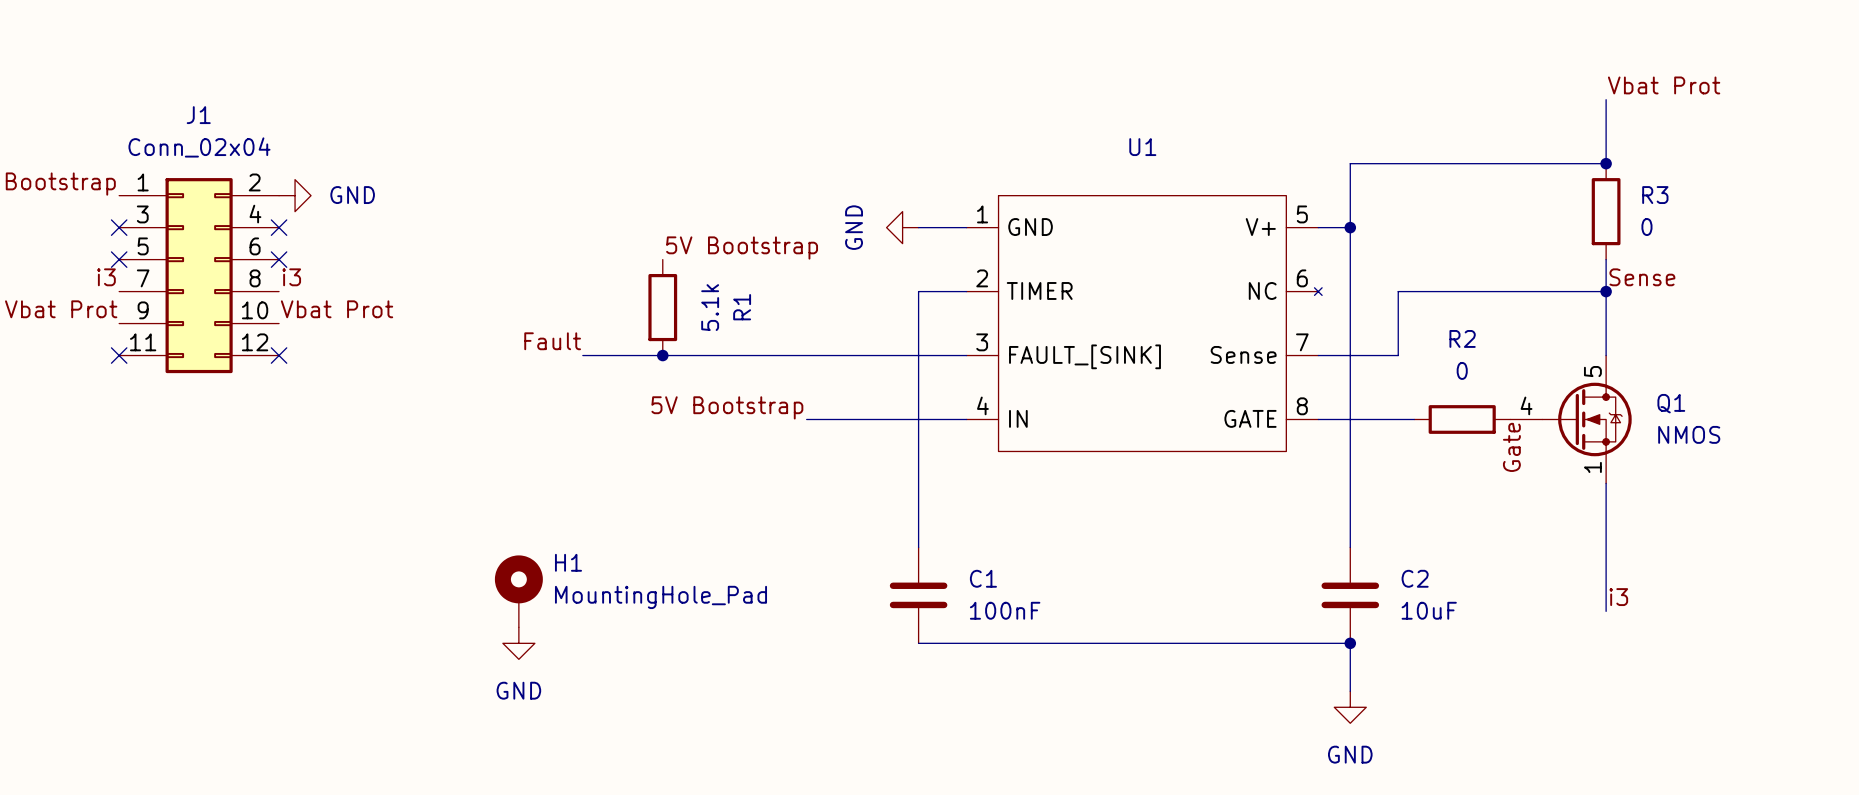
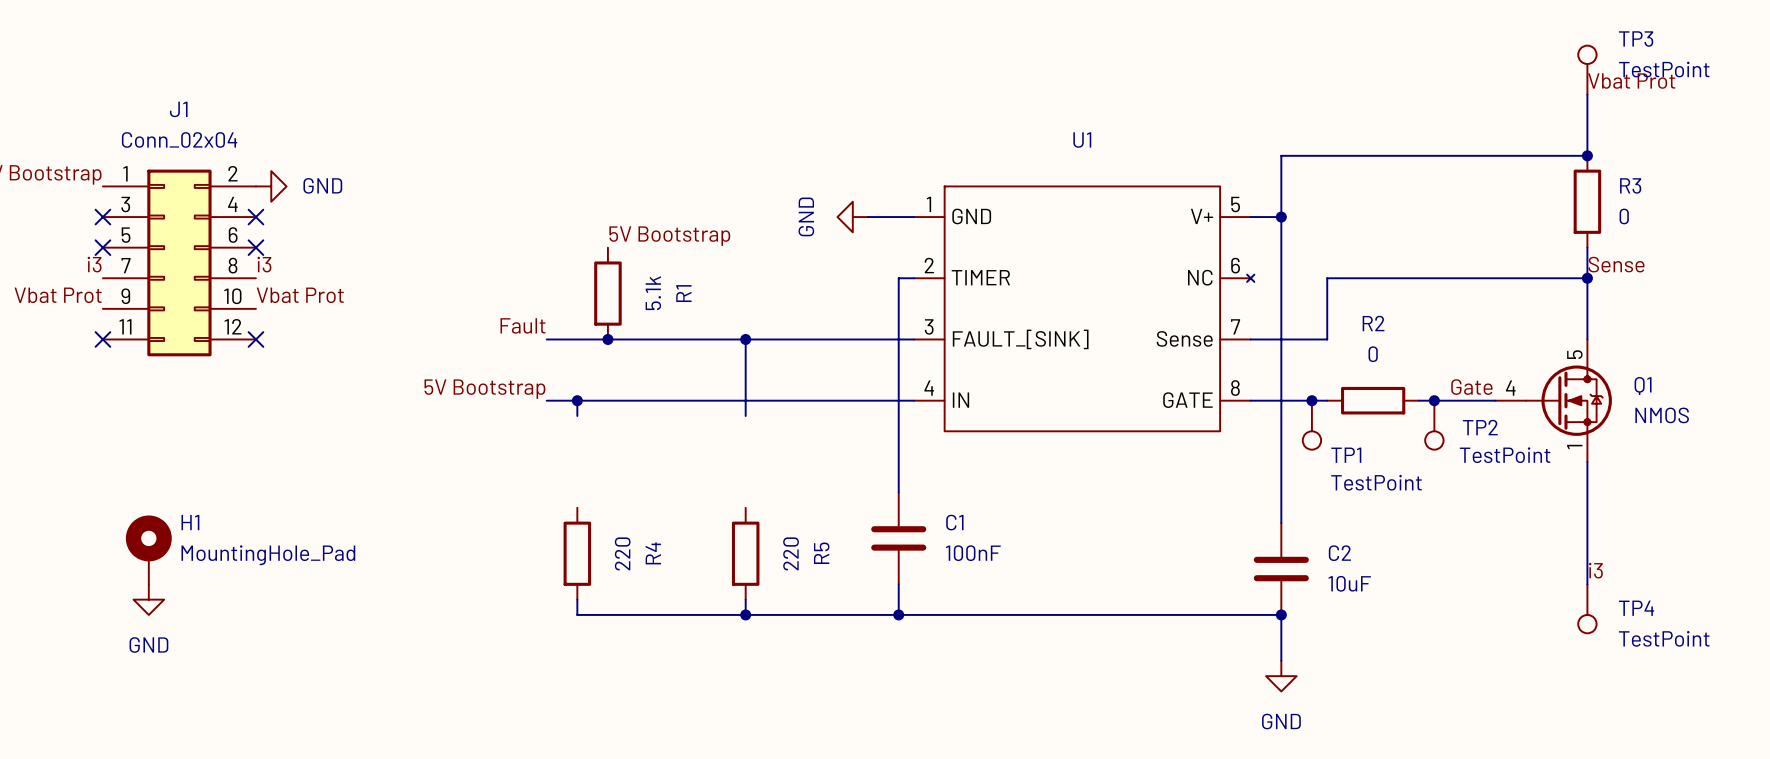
TP3: none -> TestPoint (1587, 70)
label position: Vbat Prot (1664, 85) -> Vbat Prot (1631, 81)
wire: (1606, 99) (1606, 163) -> (1587, 94) (1587, 155) (1526, 155)
junction position: (1606, 163) -> (1587, 155)
R3 position: (1606, 211) -> (1587, 201)
label position: 5V Bootstrap (742, 248) -> 5V Bootstrap (669, 236)
wire: (1606, 259) (1606, 355) -> (1587, 247) (1587, 339)
label position: Sense (1642, 277) -> Sense (1616, 264)
wire: (950, 291) (918, 291) (918, 547) -> (898, 278) (898, 492)
wire: none -> (1526, 278) (1587, 278)
junction position: (1606, 291) -> (1587, 278)
R1 position: (662, 307) -> (607, 293)
junction position: (662, 355) -> (607, 339)
wire: none -> (745, 339) (745, 416)
junction: none -> (745, 339)
label: none -> 5V Bootstrap (484, 389)
label: 5V Bootstrap (727, 407) -> none
wire: none -> (546, 400) (760, 400)
wire: none -> (577, 400) (577, 416)
junction: none -> (577, 400)
junction: none -> (1311, 400)
R2 position: (1462, 419) -> (1373, 400)
junction: none -> (1434, 400)
Q1 position: (1570, 419) -> (1553, 400)
TP1: none -> TestPoint (1311, 425)
TP2: none -> TestPoint (1434, 425)
label rotation: 0° (1511, 447) -> 90° clockwise (1471, 387)
wire: (1606, 483) (1606, 611) -> (1587, 461) (1587, 584)
R4: none -> 220 (577, 553)
R5: none -> 220 (745, 553)
H1 position: (518, 591) -> (148, 549)
C1 position: (918, 595) -> (898, 538)
label position: i3 (1618, 597) -> i3 (1595, 570)
wire: none -> (898, 584) (898, 614)
power symbol: none -> GND (148, 599)
wire: none -> (577, 599) (577, 614) (868, 614)
wire: none -> (745, 599) (745, 614)
TP4: none -> TestPoint (1587, 608)
power symbol: GND (518, 643) -> none
junction: none -> (745, 614)
junction: none -> (898, 614)

